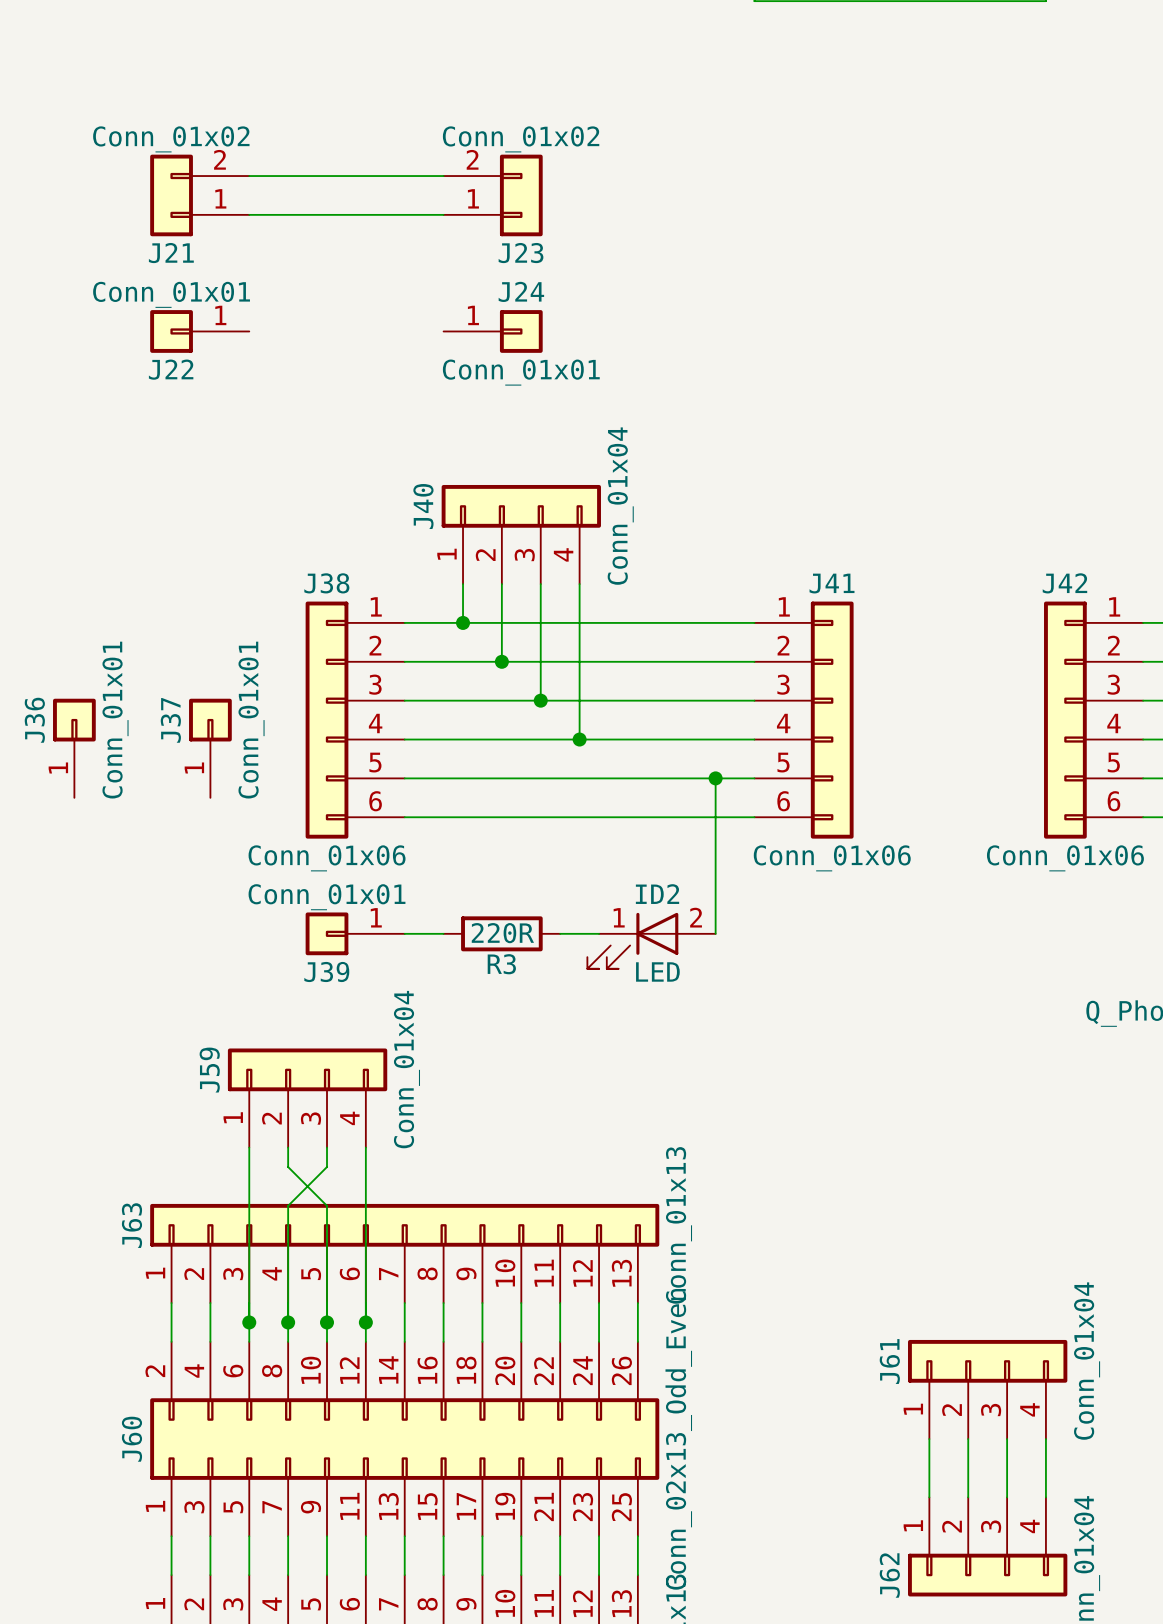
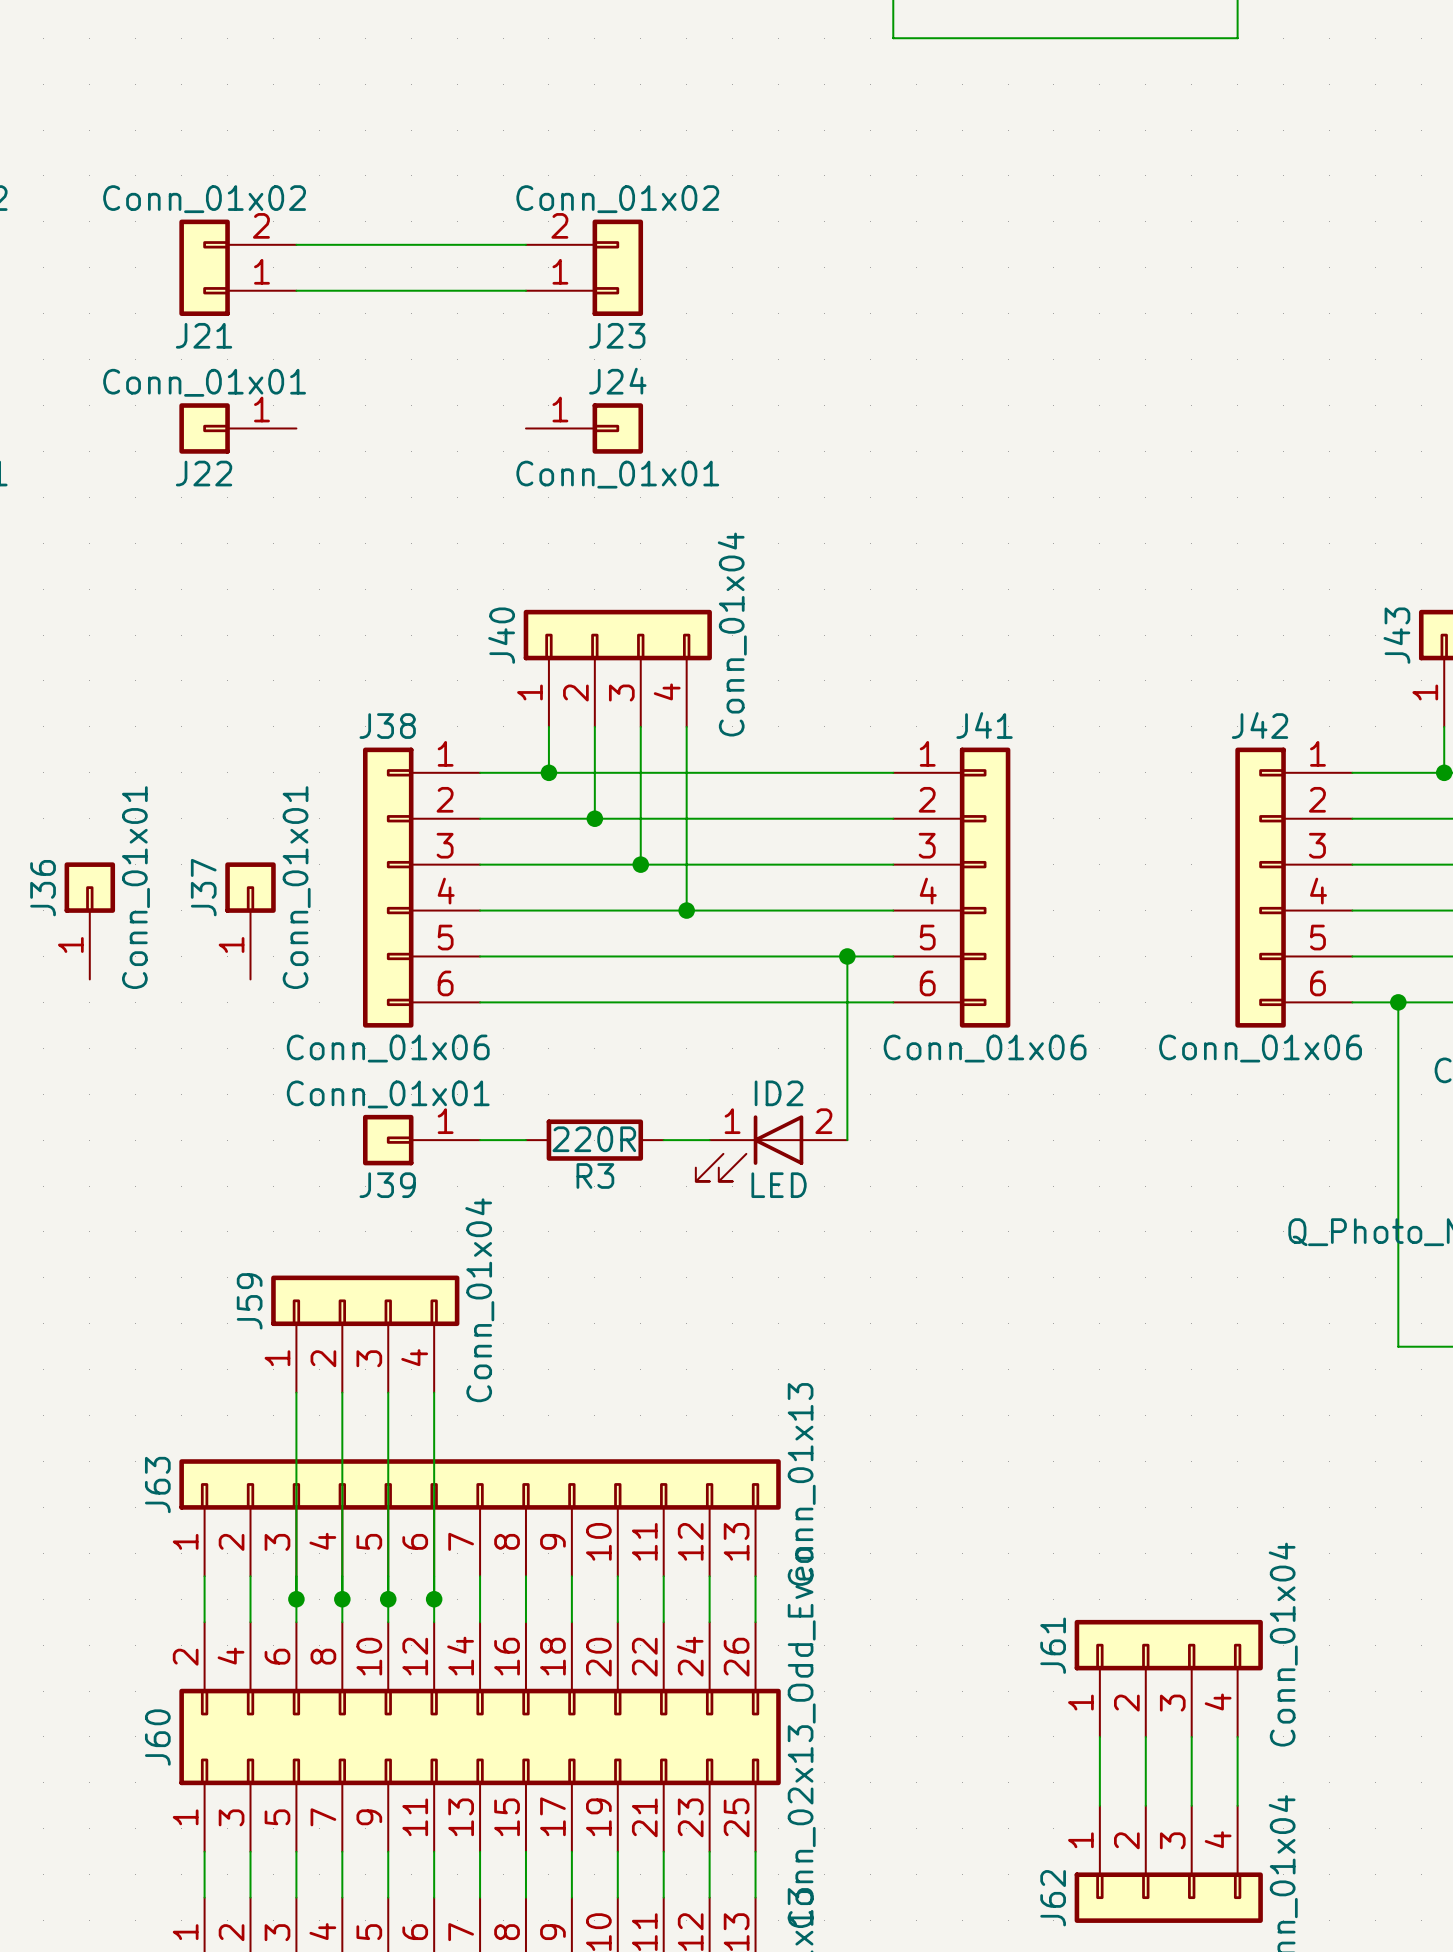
wire: (288, 1167) (327, 1205) -> (342, 1415) (342, 1461)
wire: (327, 1167) (288, 1205) -> (388, 1415) (388, 1461)

